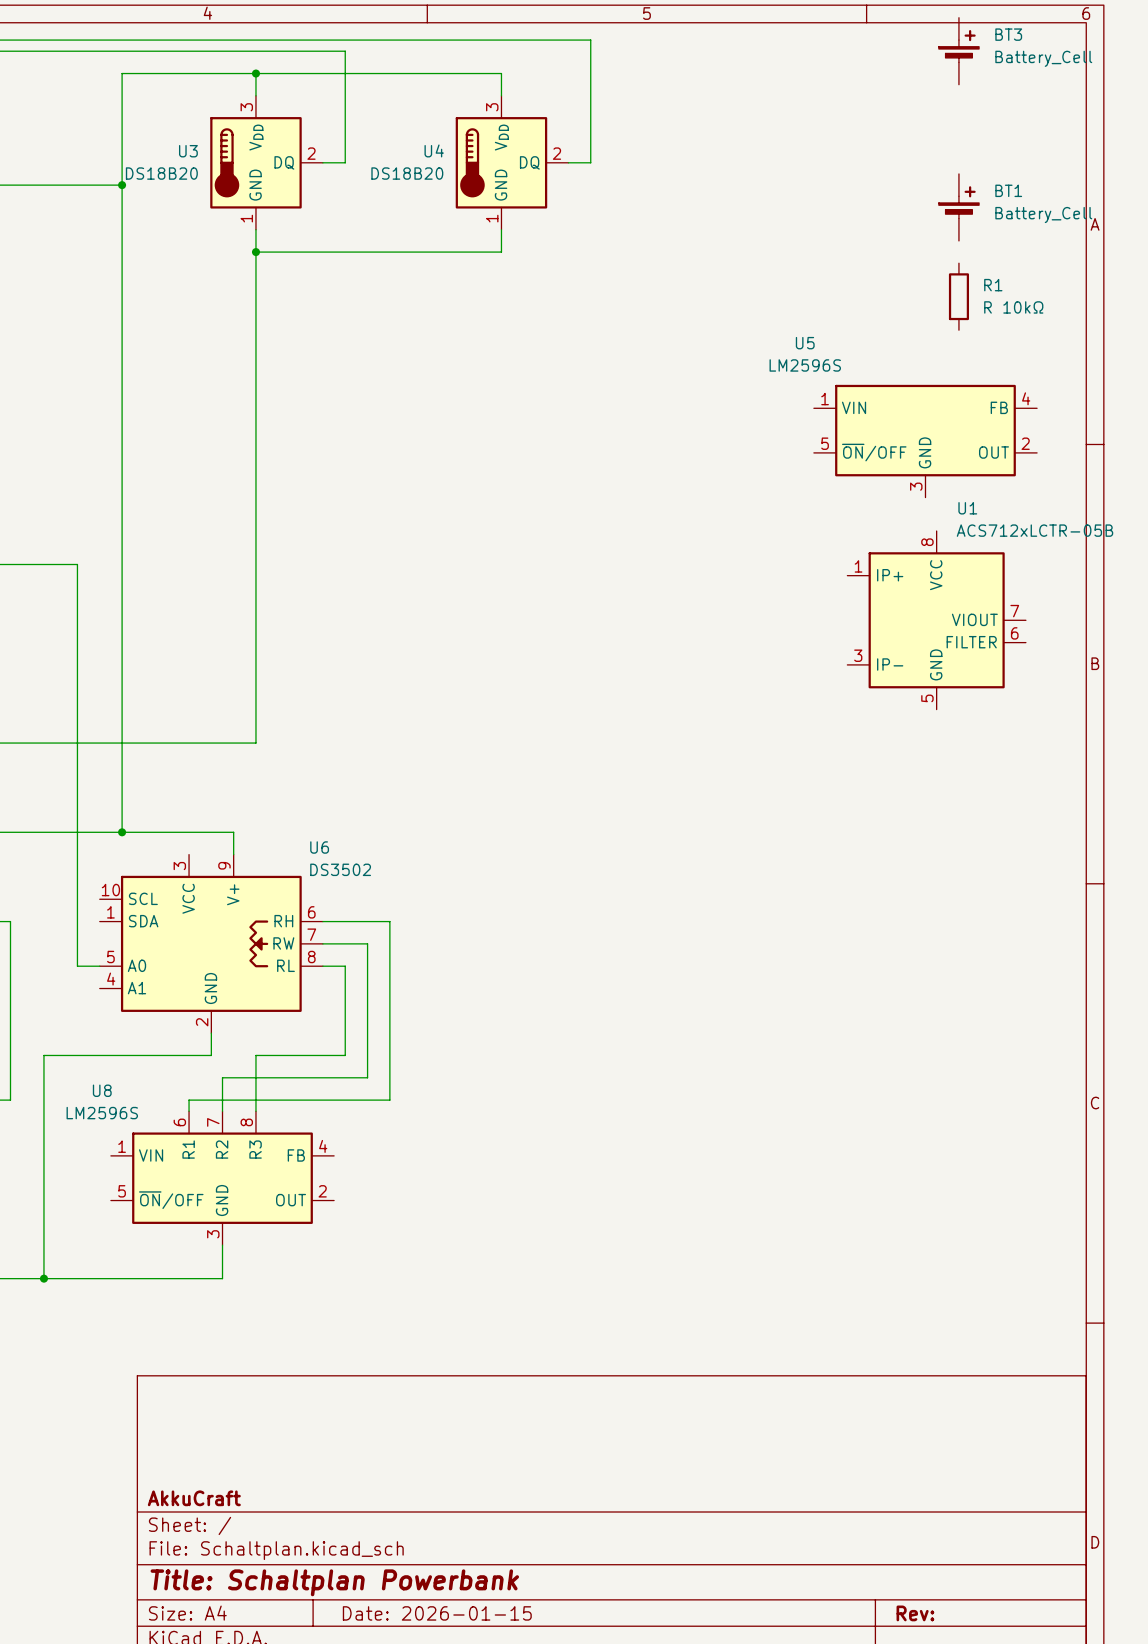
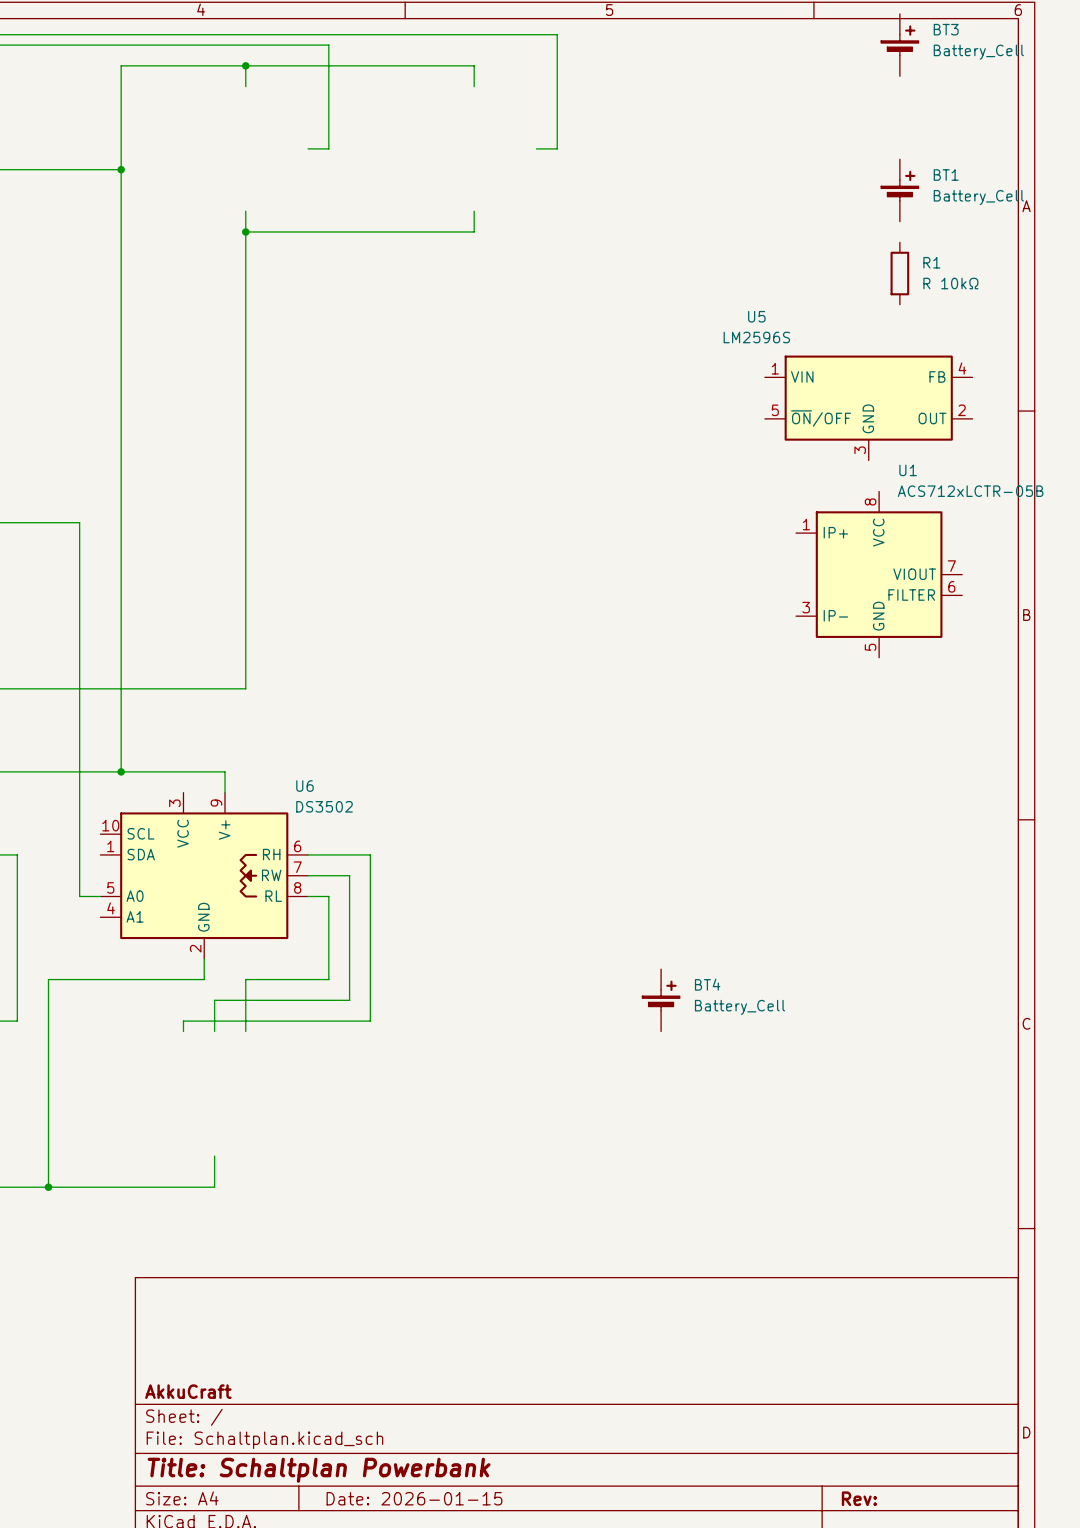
U3: DS18B20 (266, 162) -> none
U4: DS18B20 (512, 162) -> none
BT4: none -> Battery_Cell (661, 1000)
U8: LM2596S (222, 1178) -> none

